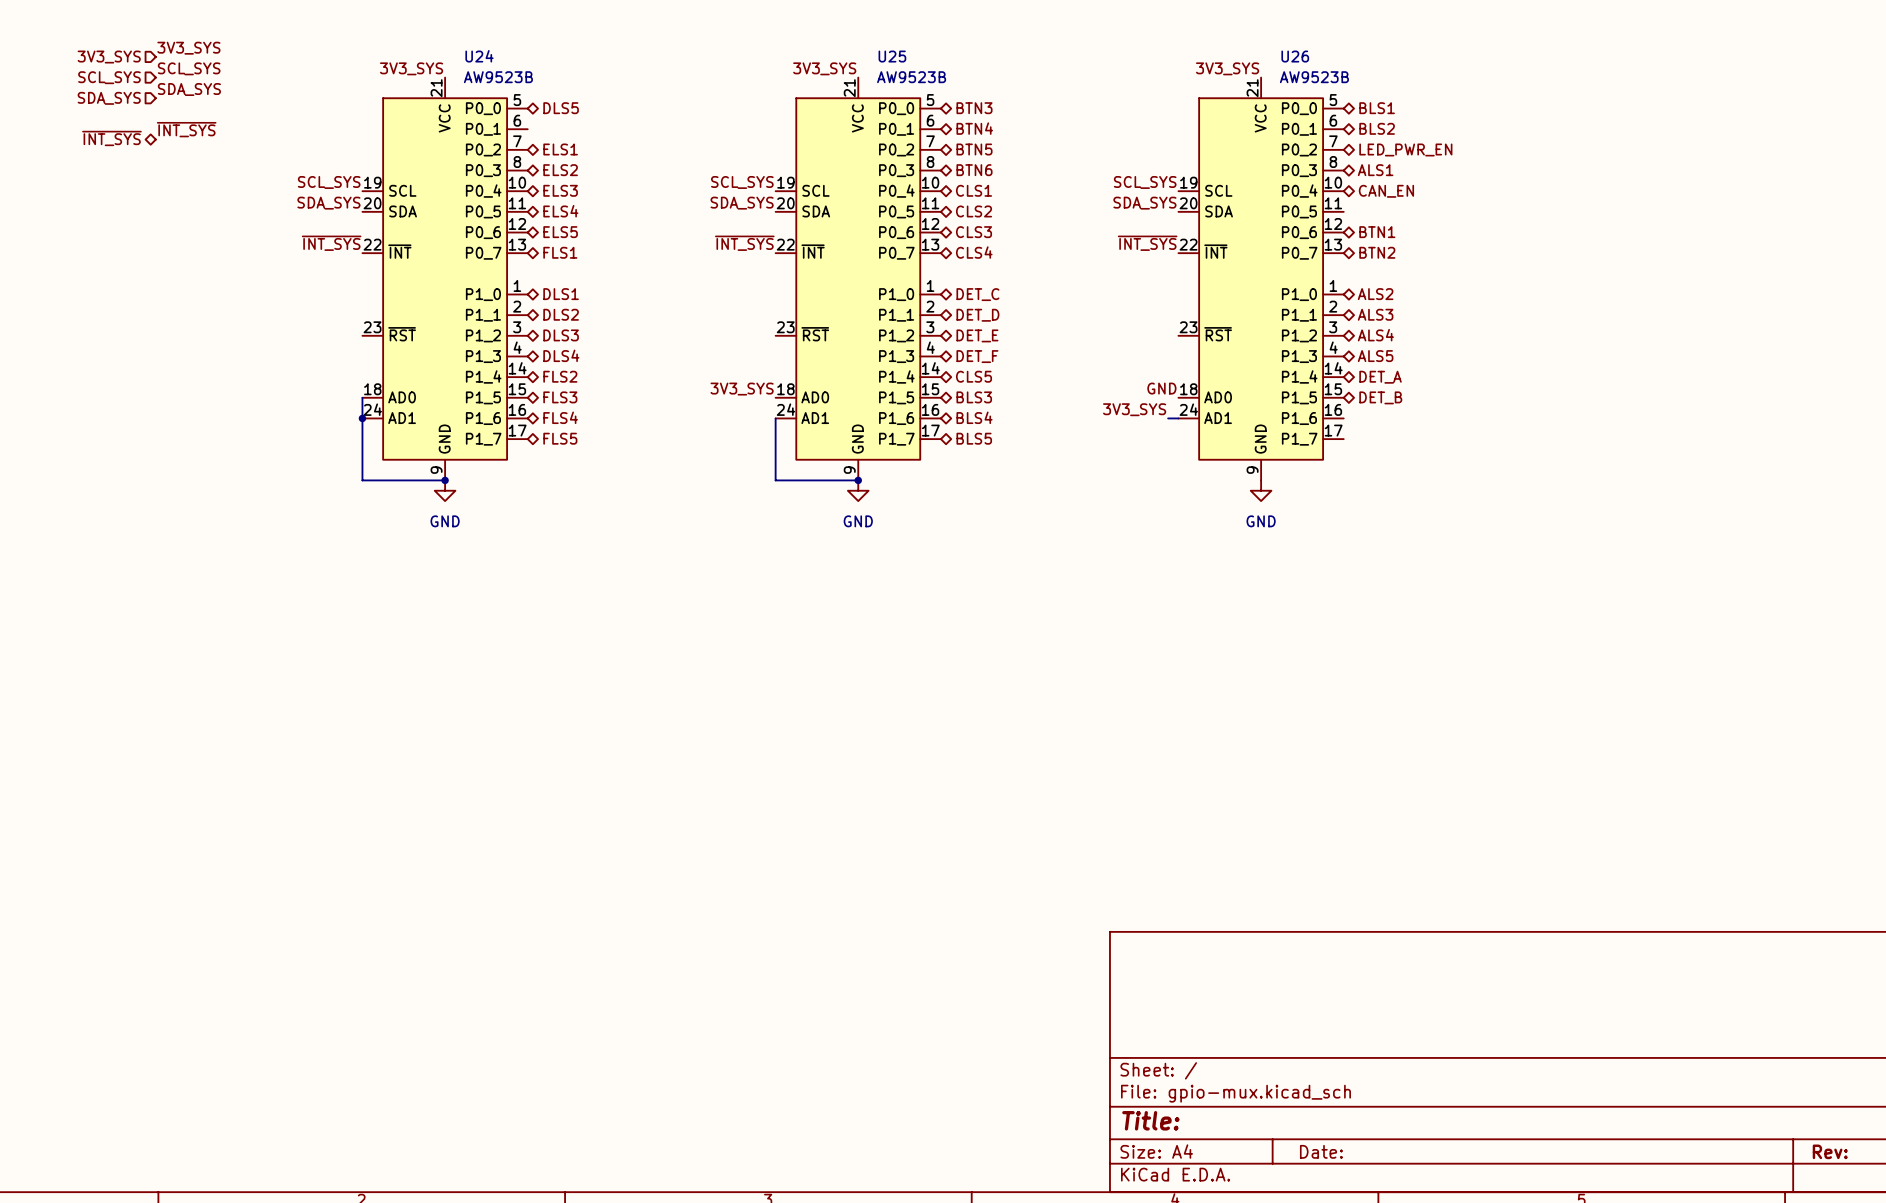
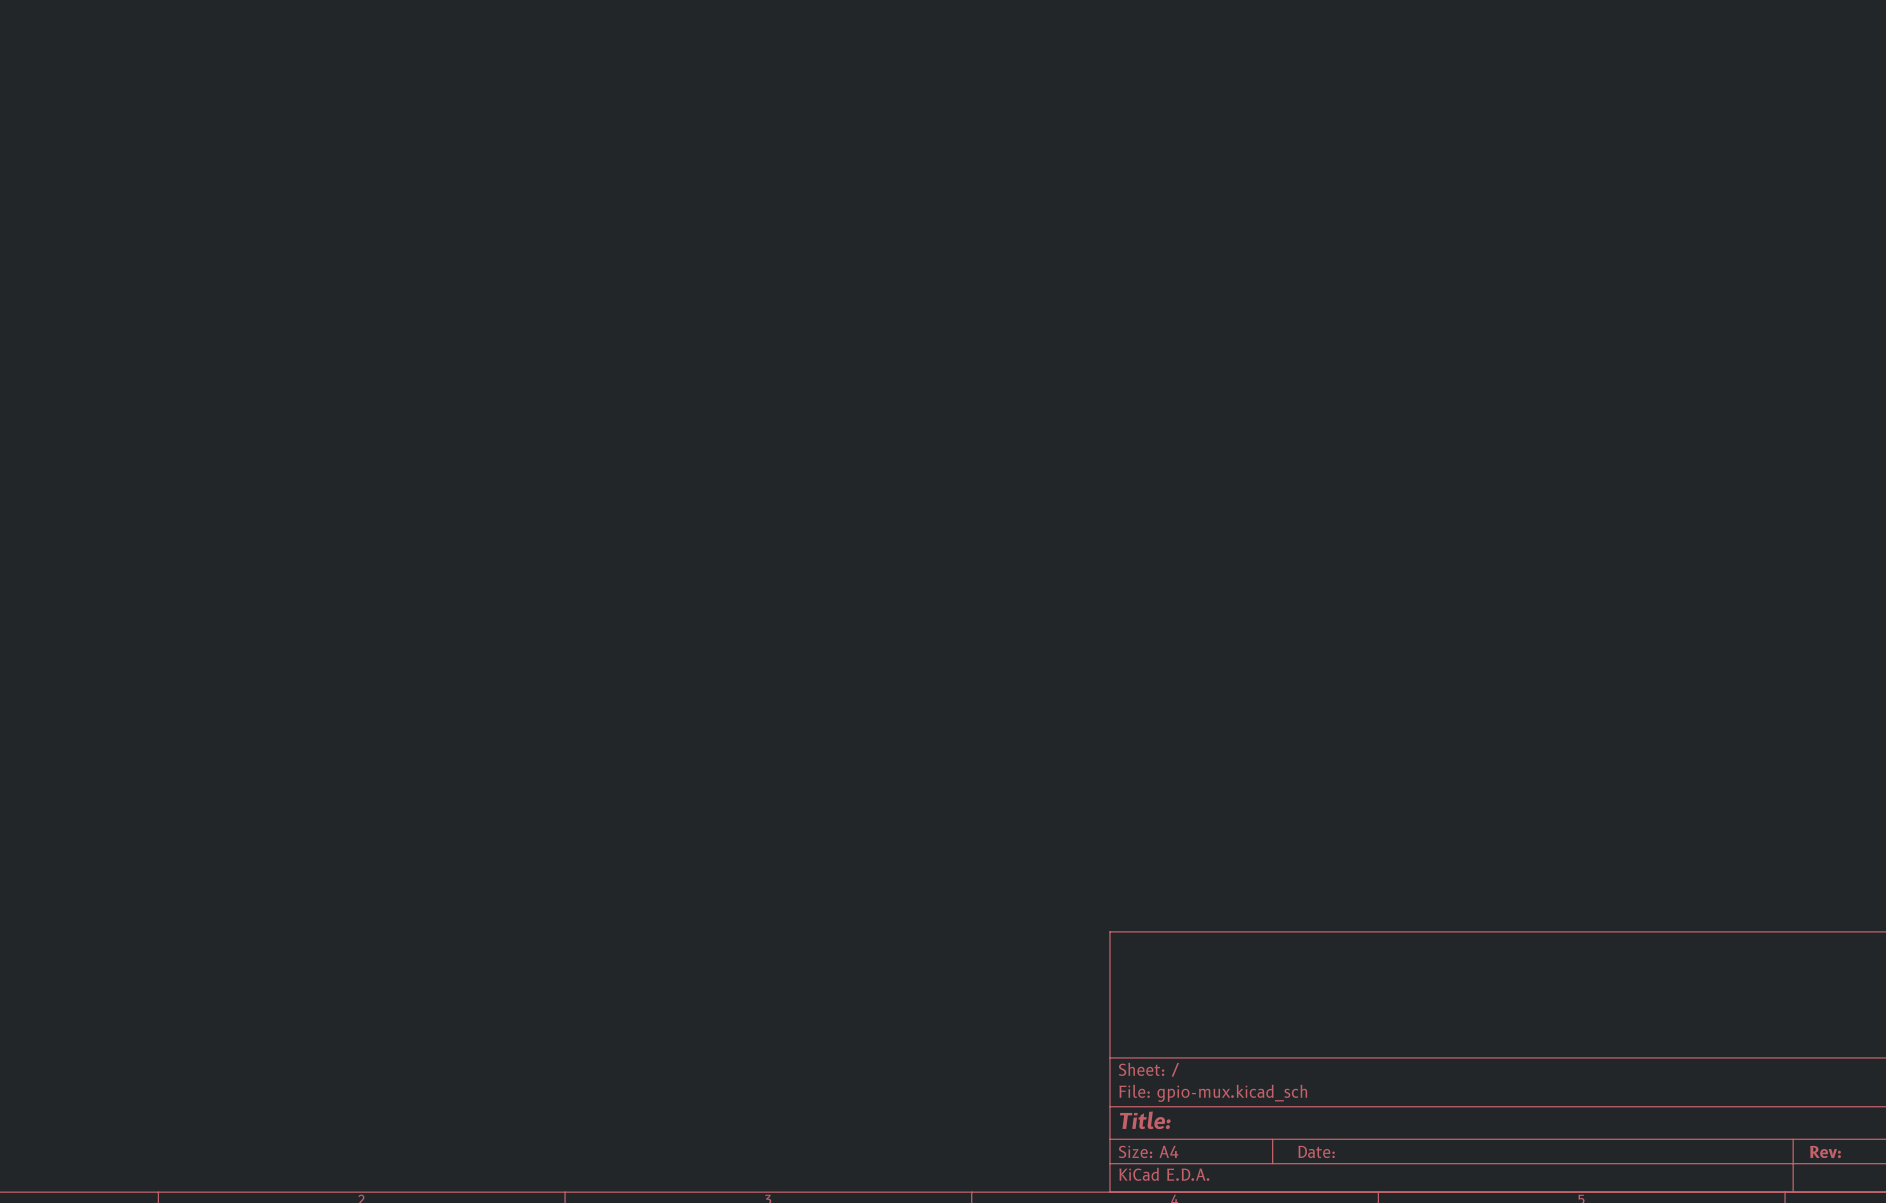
label: 3V3_SYS (188, 48) -> none
hierarchical label: 3V3_SYS (109, 57) -> none
label: SCL_SYS (189, 68) -> none
label: 3V3_SYS (411, 68) -> none
label: 3V3_SYS (824, 68) -> none
label: 3V3_SYS (1227, 68) -> none
hierarchical label: SCL_SYS (109, 77) -> none
label: SDA_SYS (189, 89) -> none
hierarchical label: SDA_SYS (109, 98) -> none
hierarchical label: DLS5 (561, 108) -> none
hierarchical label: BTN3 (974, 108) -> none
hierarchical label: BLS1 (1377, 108) -> none
hierarchical label: BTN4 (974, 128) -> none
hierarchical label: BLS2 (1377, 128) -> none
label: ~{INT_SYS} (186, 129) -> none
hierarchical label: ~{INT_SYS} (111, 138) -> none
hierarchical label: ELS1 (560, 149) -> none
hierarchical label: BTN5 (974, 149) -> none
hierarchical label: LED_PWR_EN (1405, 149) -> none
hierarchical label: ELS2 (560, 170) -> none
hierarchical label: BTN6 (974, 170) -> none
hierarchical label: ALS1 (1375, 170) -> none
label: SCL_SYS (329, 182) -> none
label: SCL_SYS (742, 182) -> none
label: SCL_SYS (1145, 182) -> none
hierarchical label: ELS3 (560, 190) -> none
hierarchical label: CLS1 (974, 190) -> none
hierarchical label: CAN_EN (1386, 191) -> none
label: SDA_SYS (328, 203) -> none
label: SDA_SYS (742, 203) -> none
label: SDA_SYS (1144, 203) -> none
hierarchical label: ELS4 (560, 211) -> none
hierarchical label: CLS2 (974, 211) -> none
hierarchical label: ELS5 (560, 232) -> none
hierarchical label: CLS3 (974, 232) -> none
hierarchical label: BTN1 (1377, 232) -> none
label: ~{INT_SYS} (331, 243) -> none
label: ~{INT_SYS} (744, 243) -> none
label: ~{INT_SYS} (1147, 243) -> none
hierarchical label: FLS1 (560, 252) -> none
hierarchical label: CLS4 (974, 252) -> none
hierarchical label: BTN2 (1377, 252) -> none
U24: AW9523B (445, 278) -> none
U25: AW9523B (858, 278) -> none
U26: AW9523B (1261, 278) -> none
hierarchical label: DLS1 (561, 294) -> none
hierarchical label: DET_C (977, 294) -> none
hierarchical label: ALS2 (1375, 294) -> none
hierarchical label: DLS2 (561, 314) -> none
hierarchical label: ALS3 (1375, 314) -> none
hierarchical label: DET_D (977, 315) -> none
hierarchical label: DLS3 (561, 335) -> none
hierarchical label: DET_E (977, 335) -> none
hierarchical label: ALS4 (1375, 335) -> none
hierarchical label: DLS4 (561, 355) -> none
hierarchical label: DET_F (977, 356) -> none
hierarchical label: ALS5 (1375, 356) -> none
hierarchical label: FLS2 (560, 376) -> none
hierarchical label: CLS5 (974, 376) -> none
hierarchical label: DET_A (1380, 377) -> none
label: GND (1161, 388) -> none
label: 3V3_SYS (742, 389) -> none
wire: (362, 397) (362, 480) (445, 480) -> none
hierarchical label: FLS3 (560, 397) -> none
hierarchical label: BLS3 (974, 397) -> none
hierarchical label: DET_B (1380, 397) -> none
label: 3V3_SYS (1134, 409) -> none
hierarchical label: FLS4 (560, 417) -> none
hierarchical label: BLS4 (974, 417) -> none
junction: (362, 418) -> none
wire: (775, 418) (775, 480) (858, 480) -> none
wire: (1168, 418) (1178, 418) -> none
hierarchical label: FLS5 (560, 438) -> none
hierarchical label: BLS5 (974, 438) -> none
junction: (445, 480) -> none
junction: (858, 480) -> none
power symbol: GND (445, 490) -> none
power symbol: GND (858, 490) -> none
power symbol: GND (1261, 490) -> none

